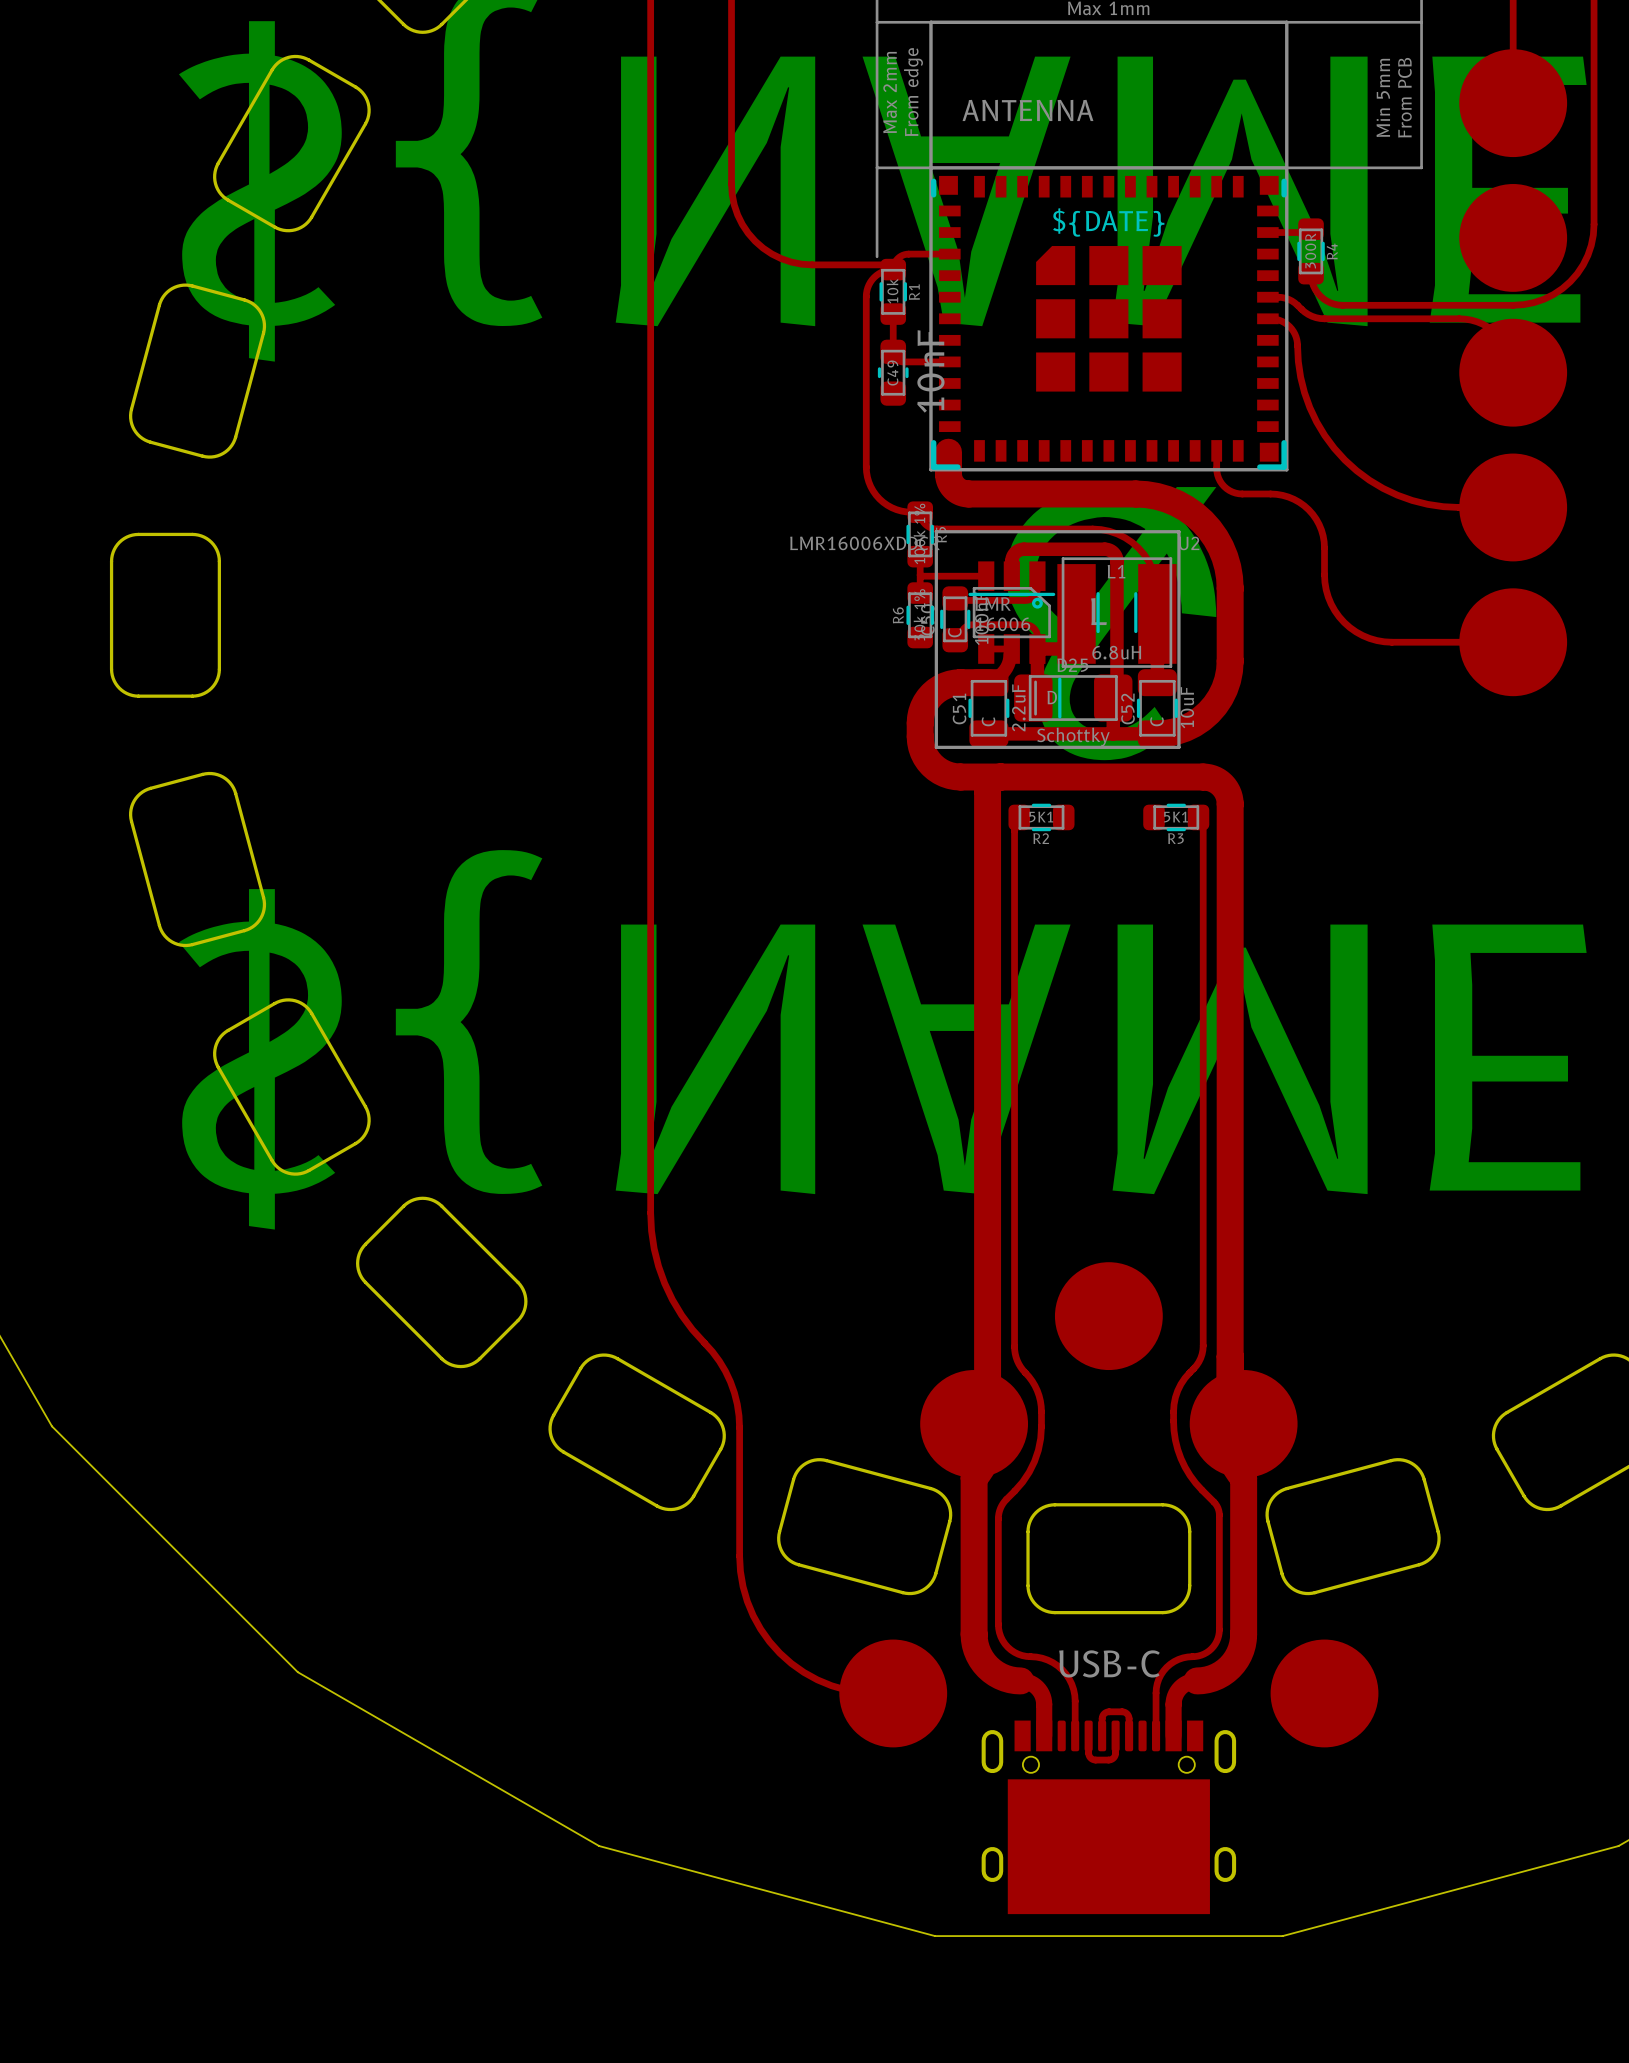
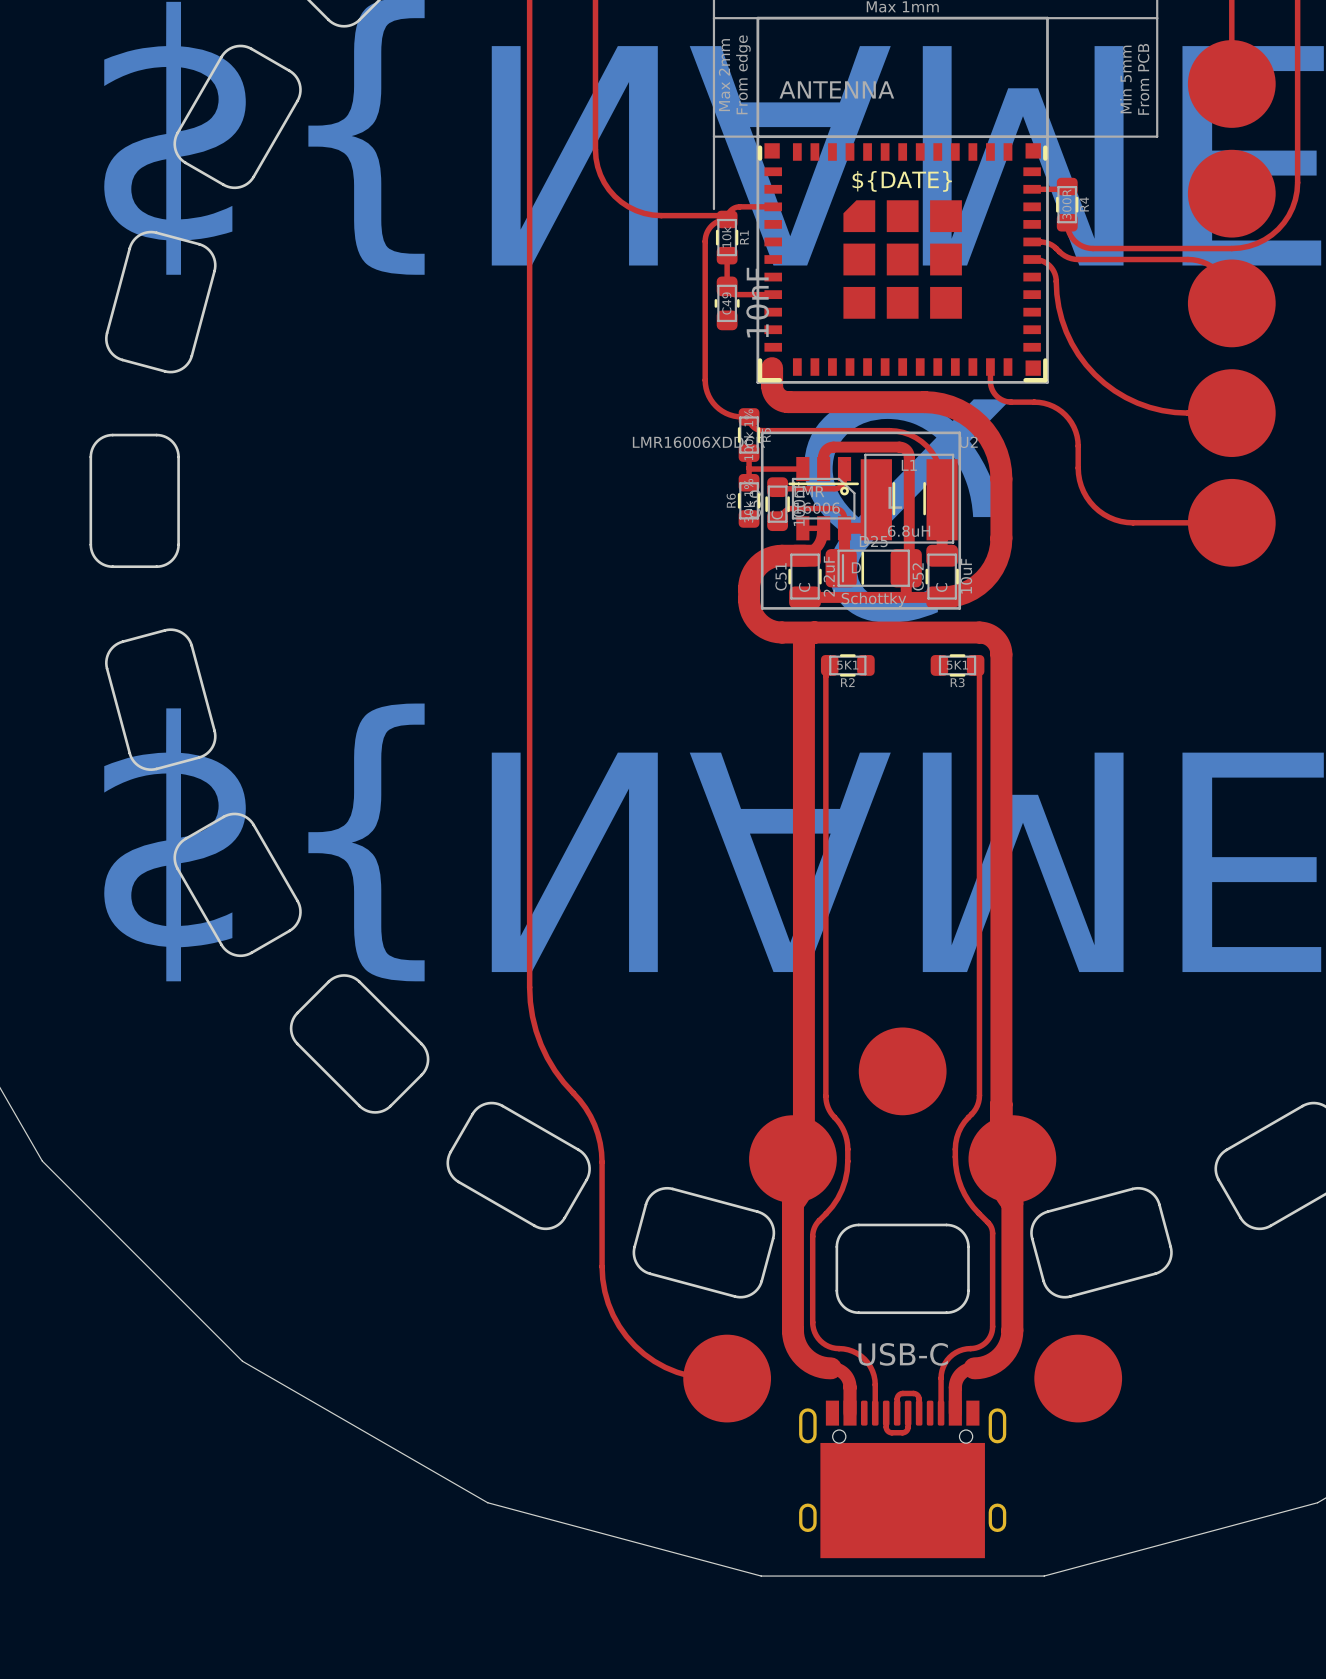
part footprint: [981, 1720, 1237, 1915] -> [799, 1400, 1007, 1559]

